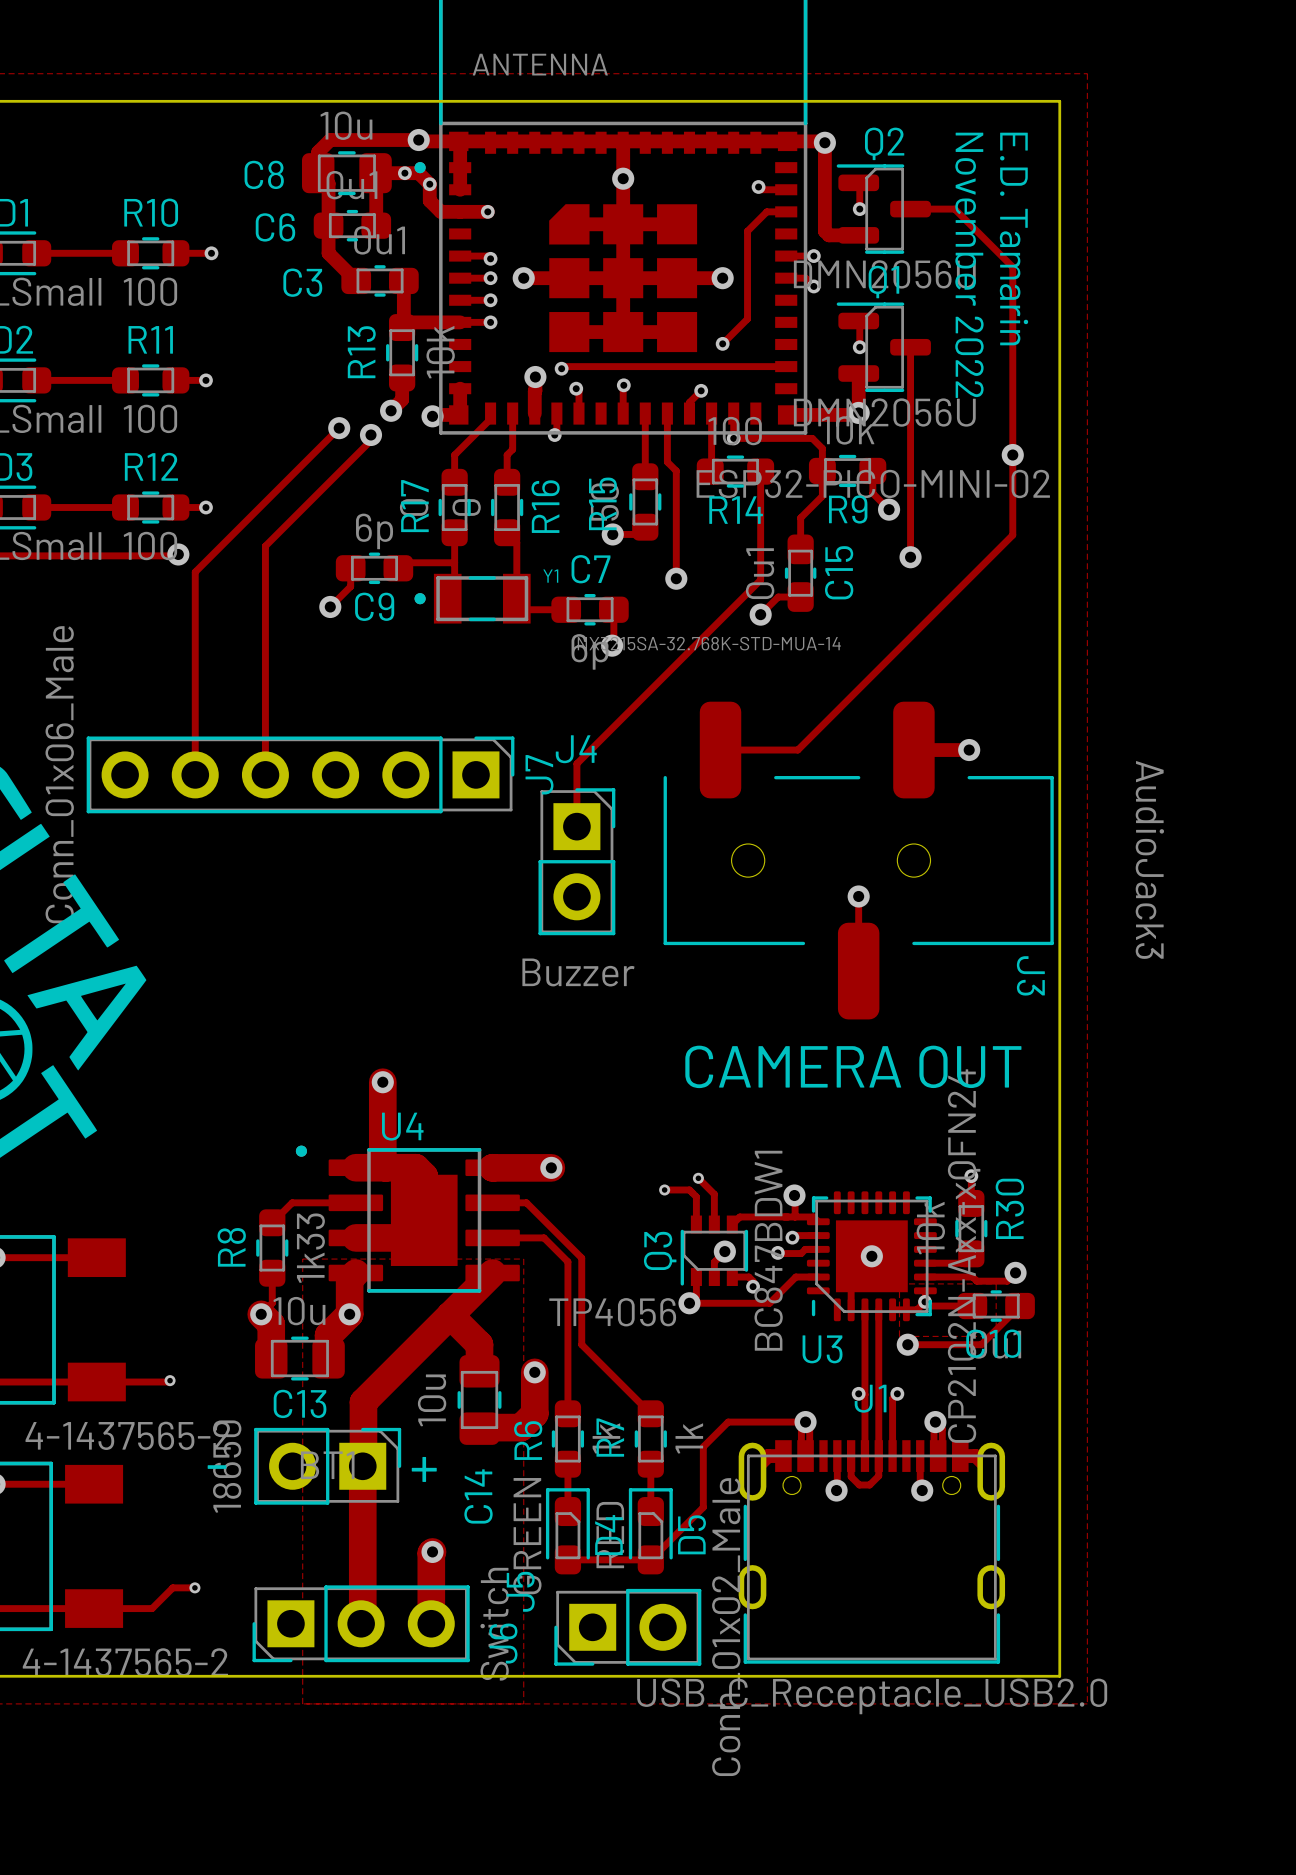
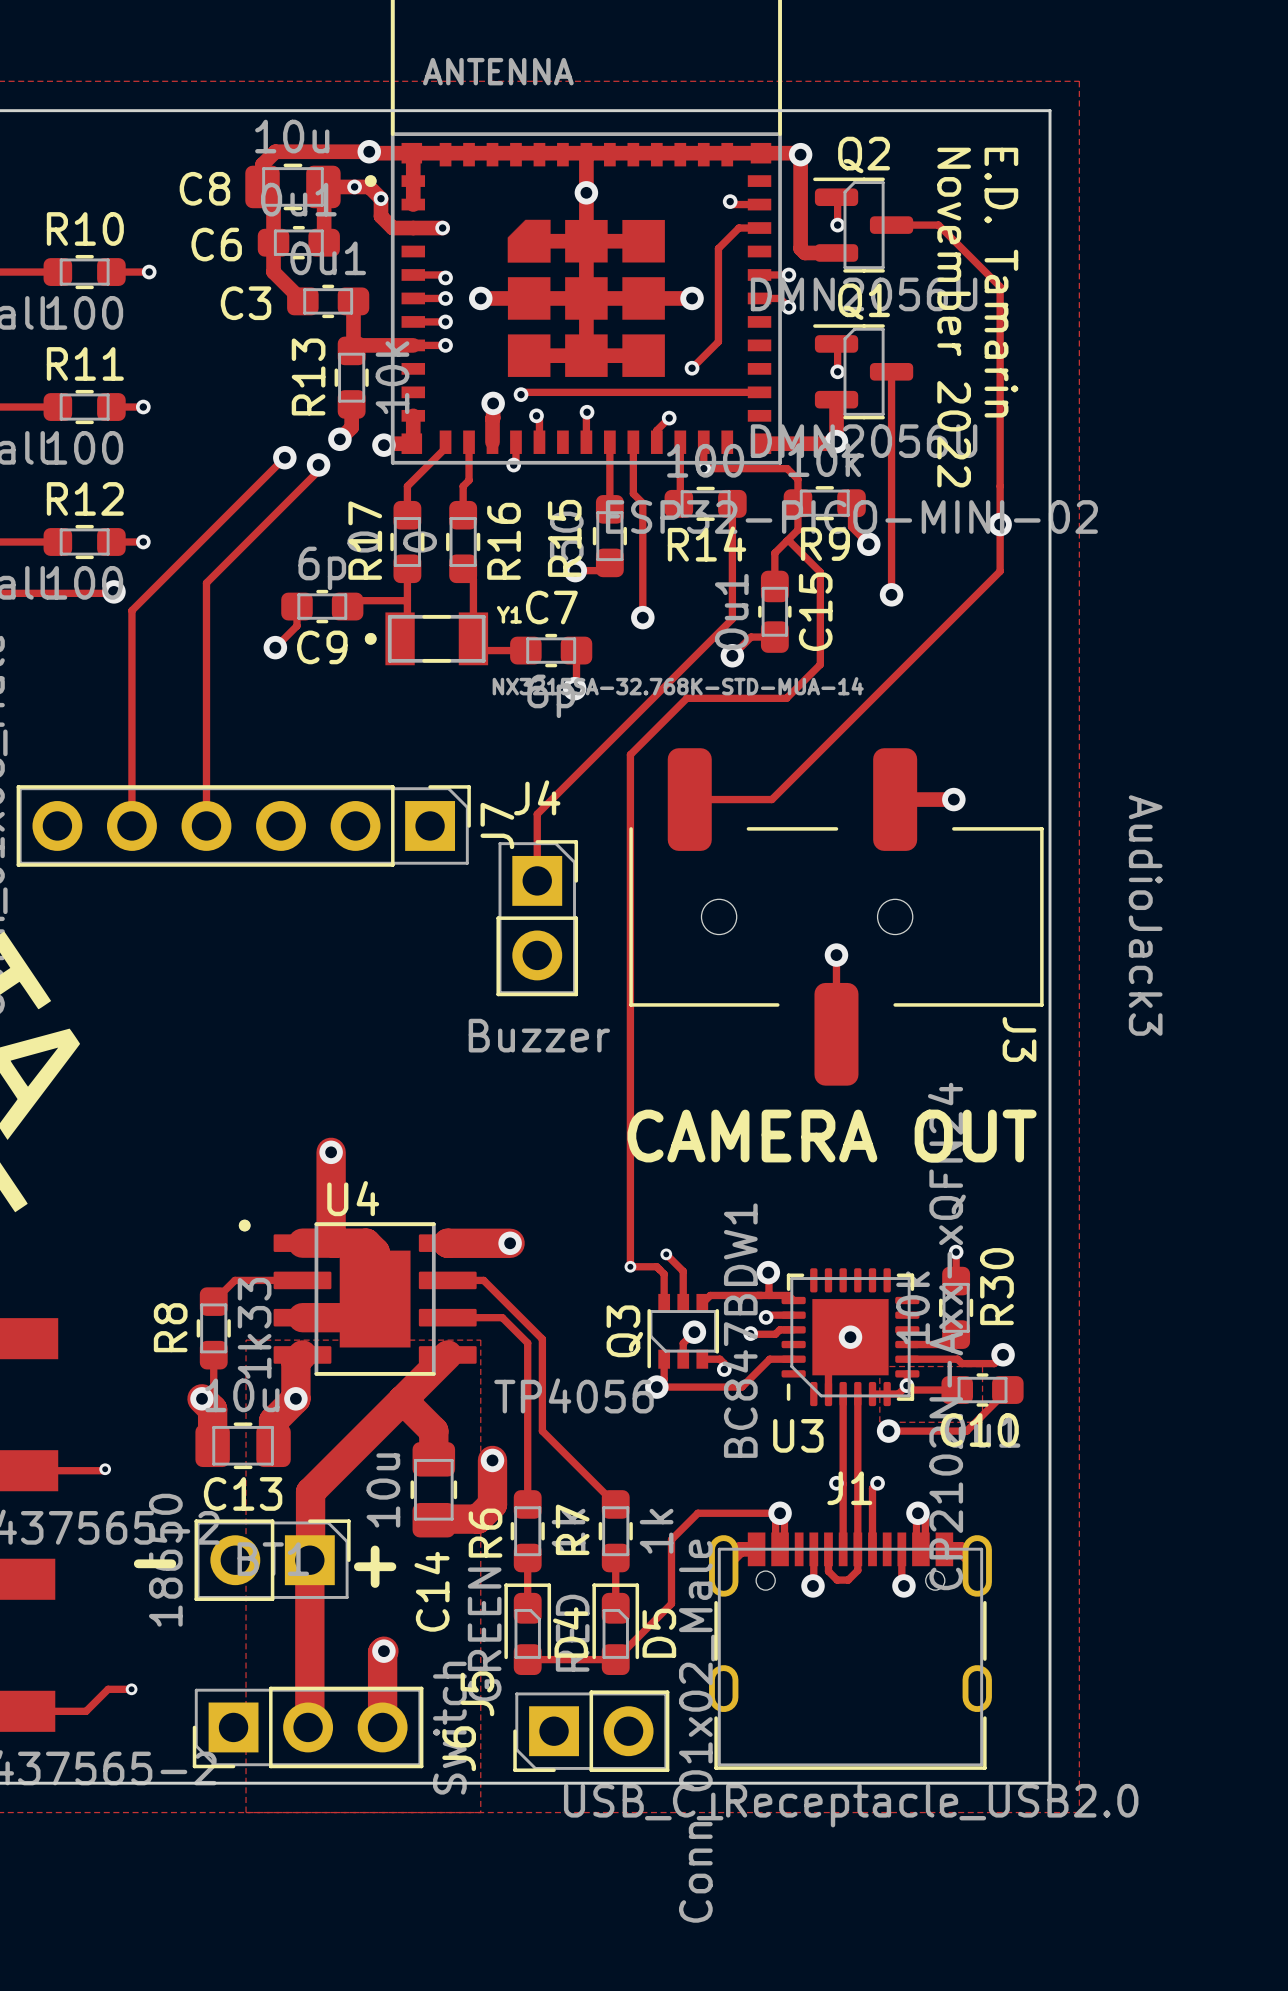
via position: (1012, 455) -> (1000, 524)
track: none -> (786, 541) (789, 541) (820, 572) (820, 664) (786, 698) (686, 698) (630, 754) (630, 1266)

